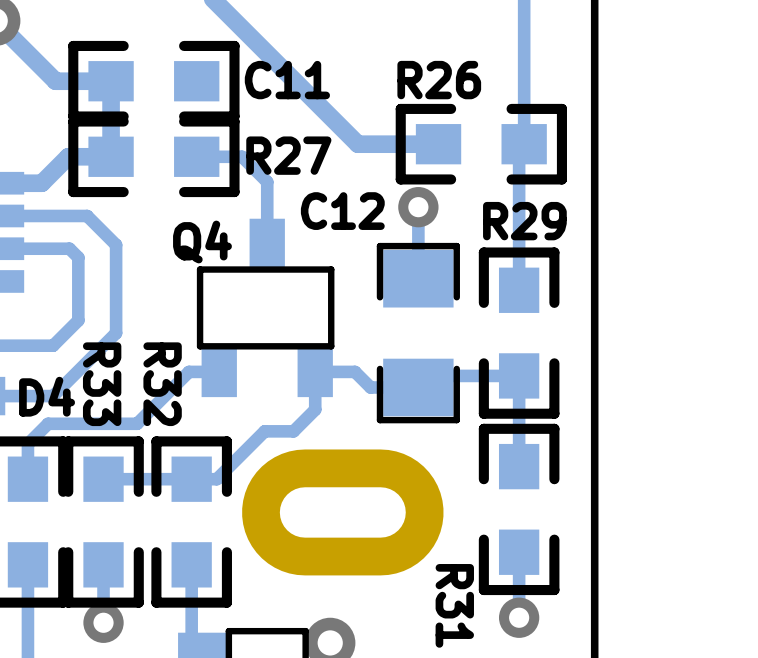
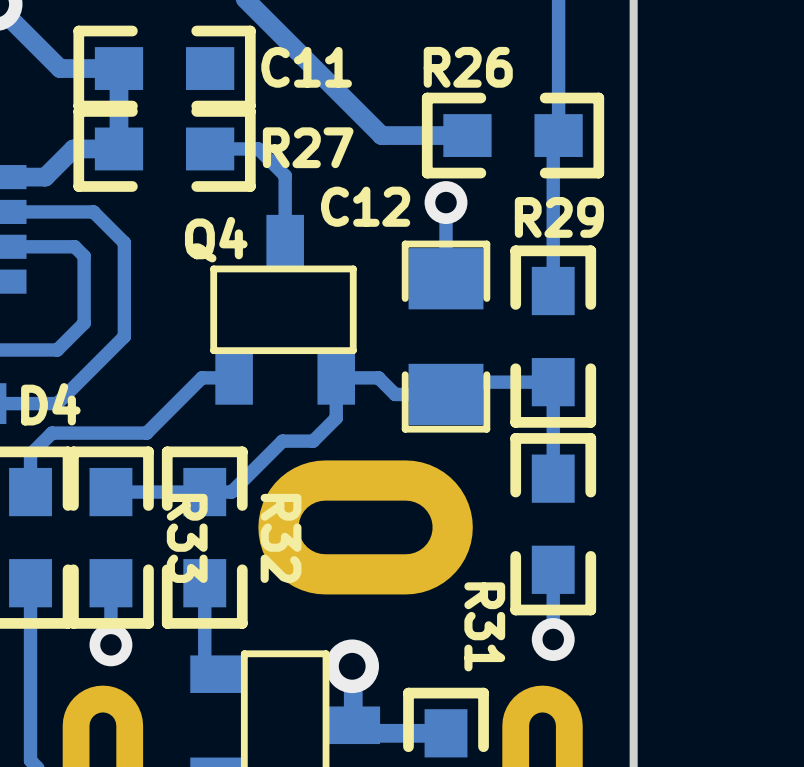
R33 name position: R33 (102, 384) -> R33 (187, 538)
R32 name position: R32 (162, 384) -> R32 (281, 538)

